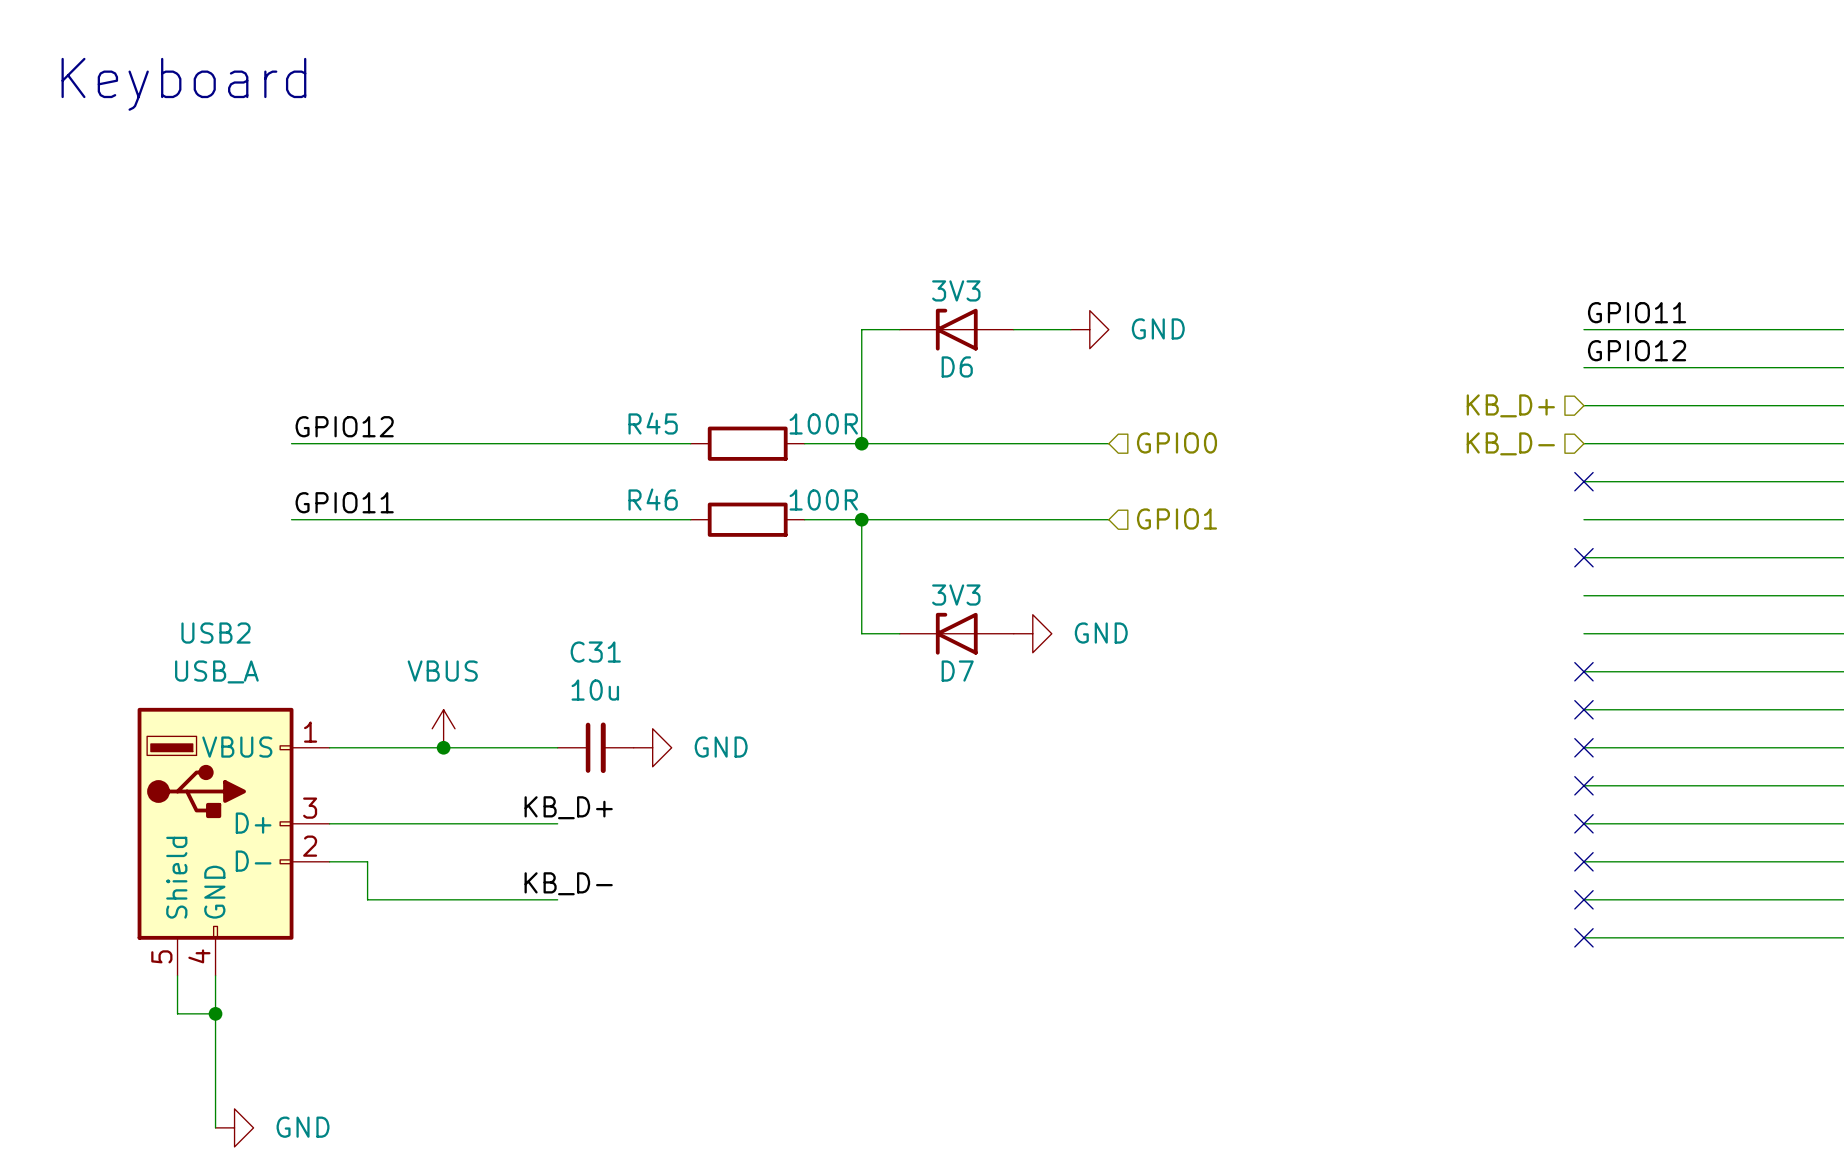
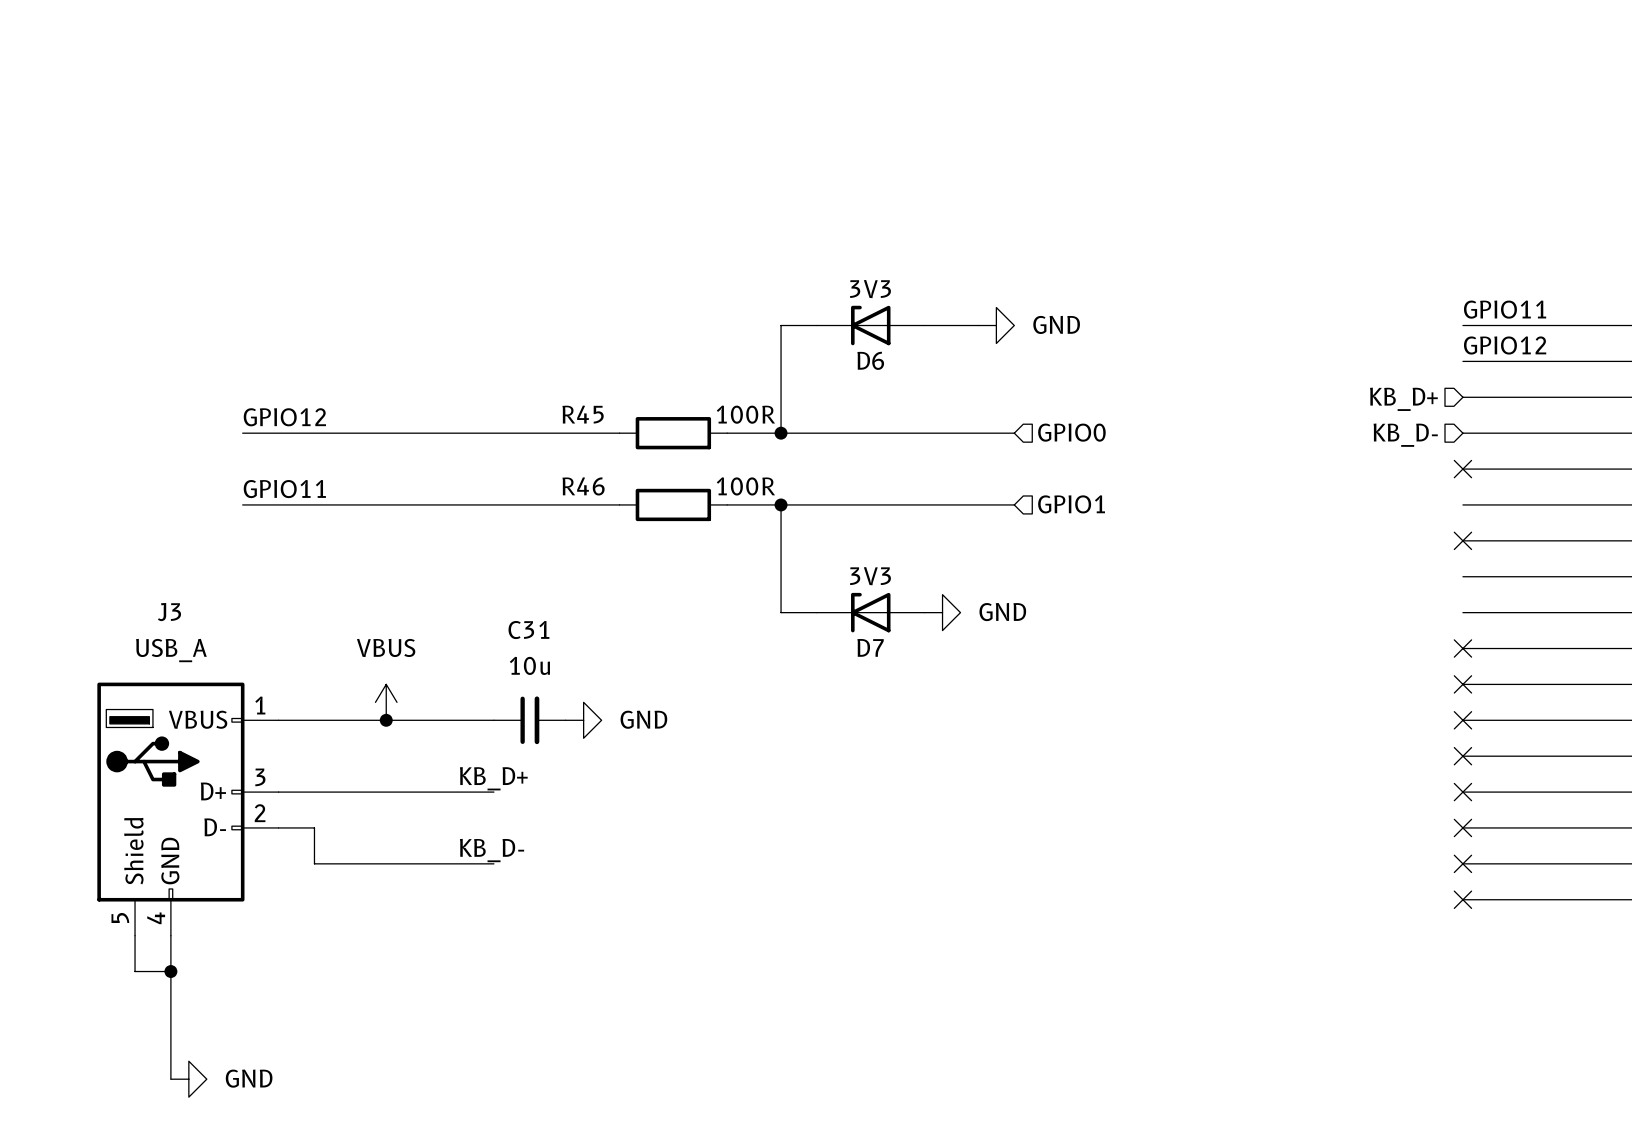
text: Keyboard (183, 84) -> none
USB2 name: USB2 (215, 633) -> J3 (169, 612)

